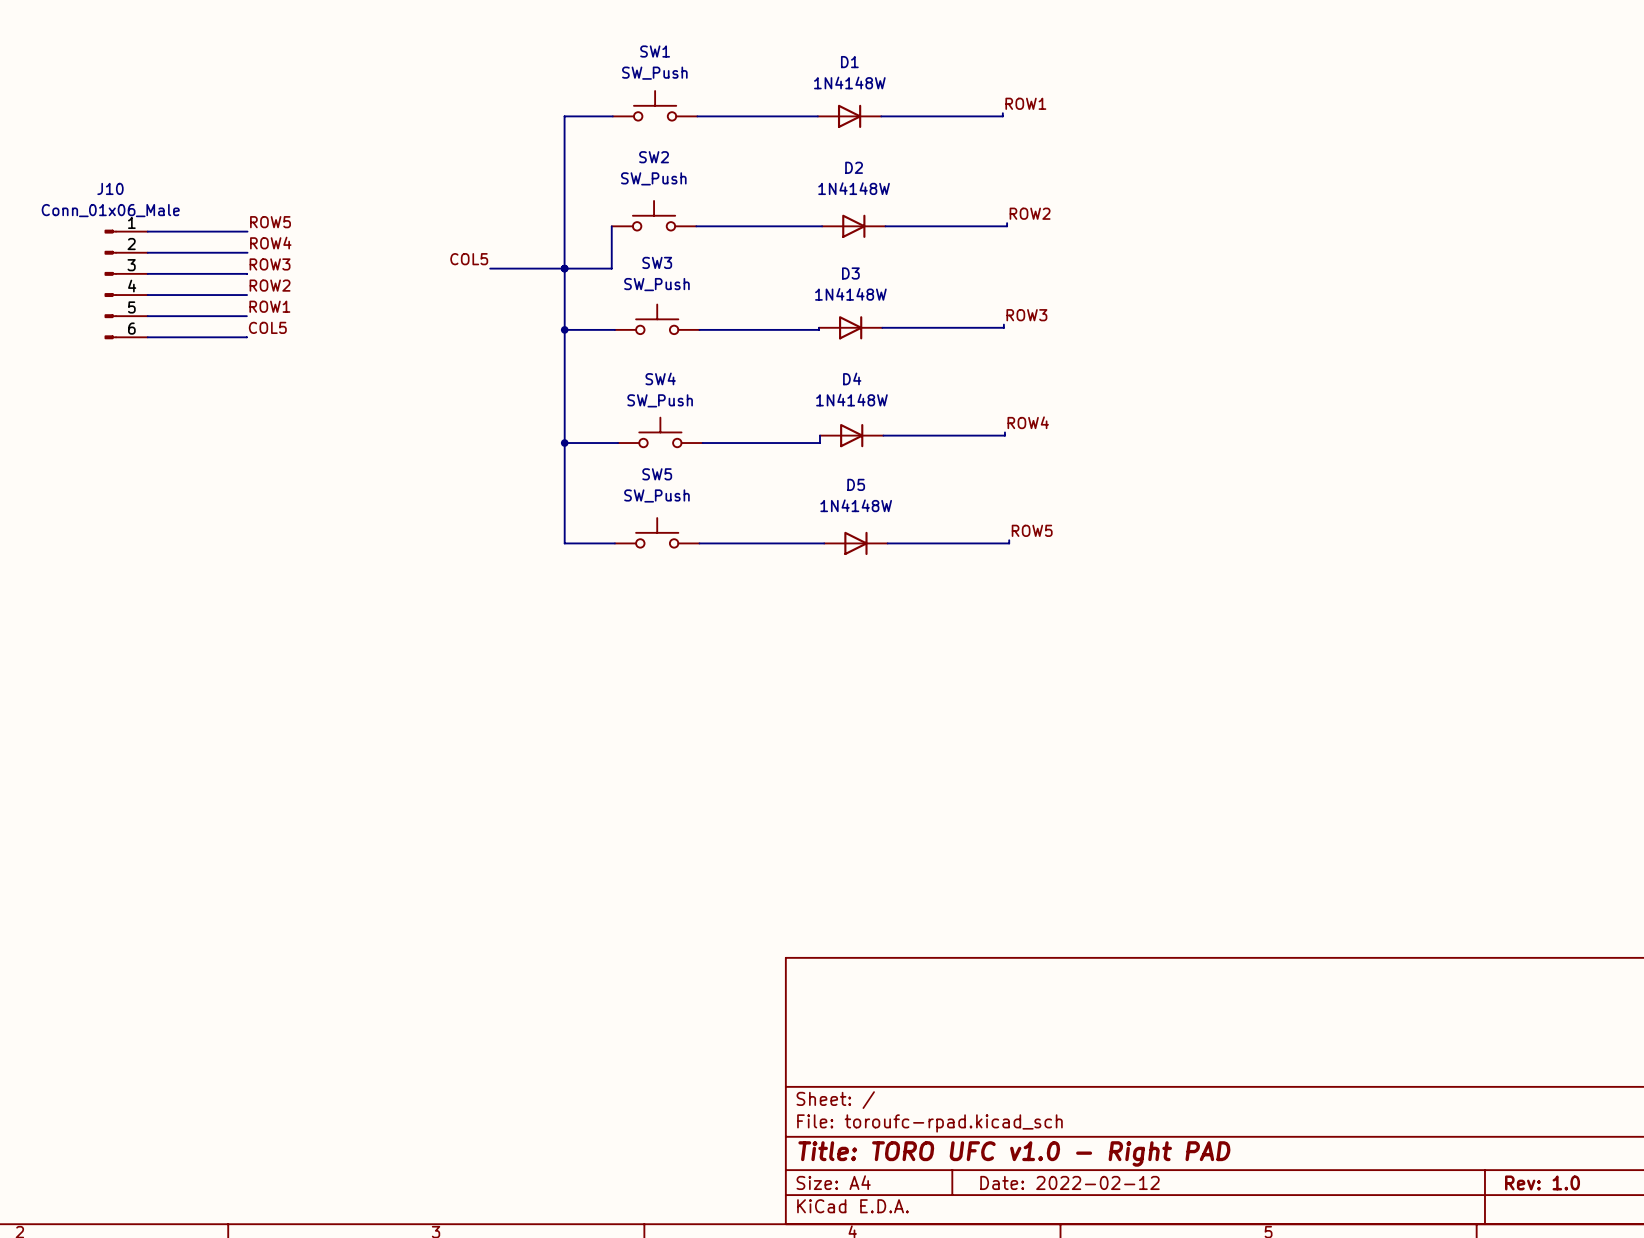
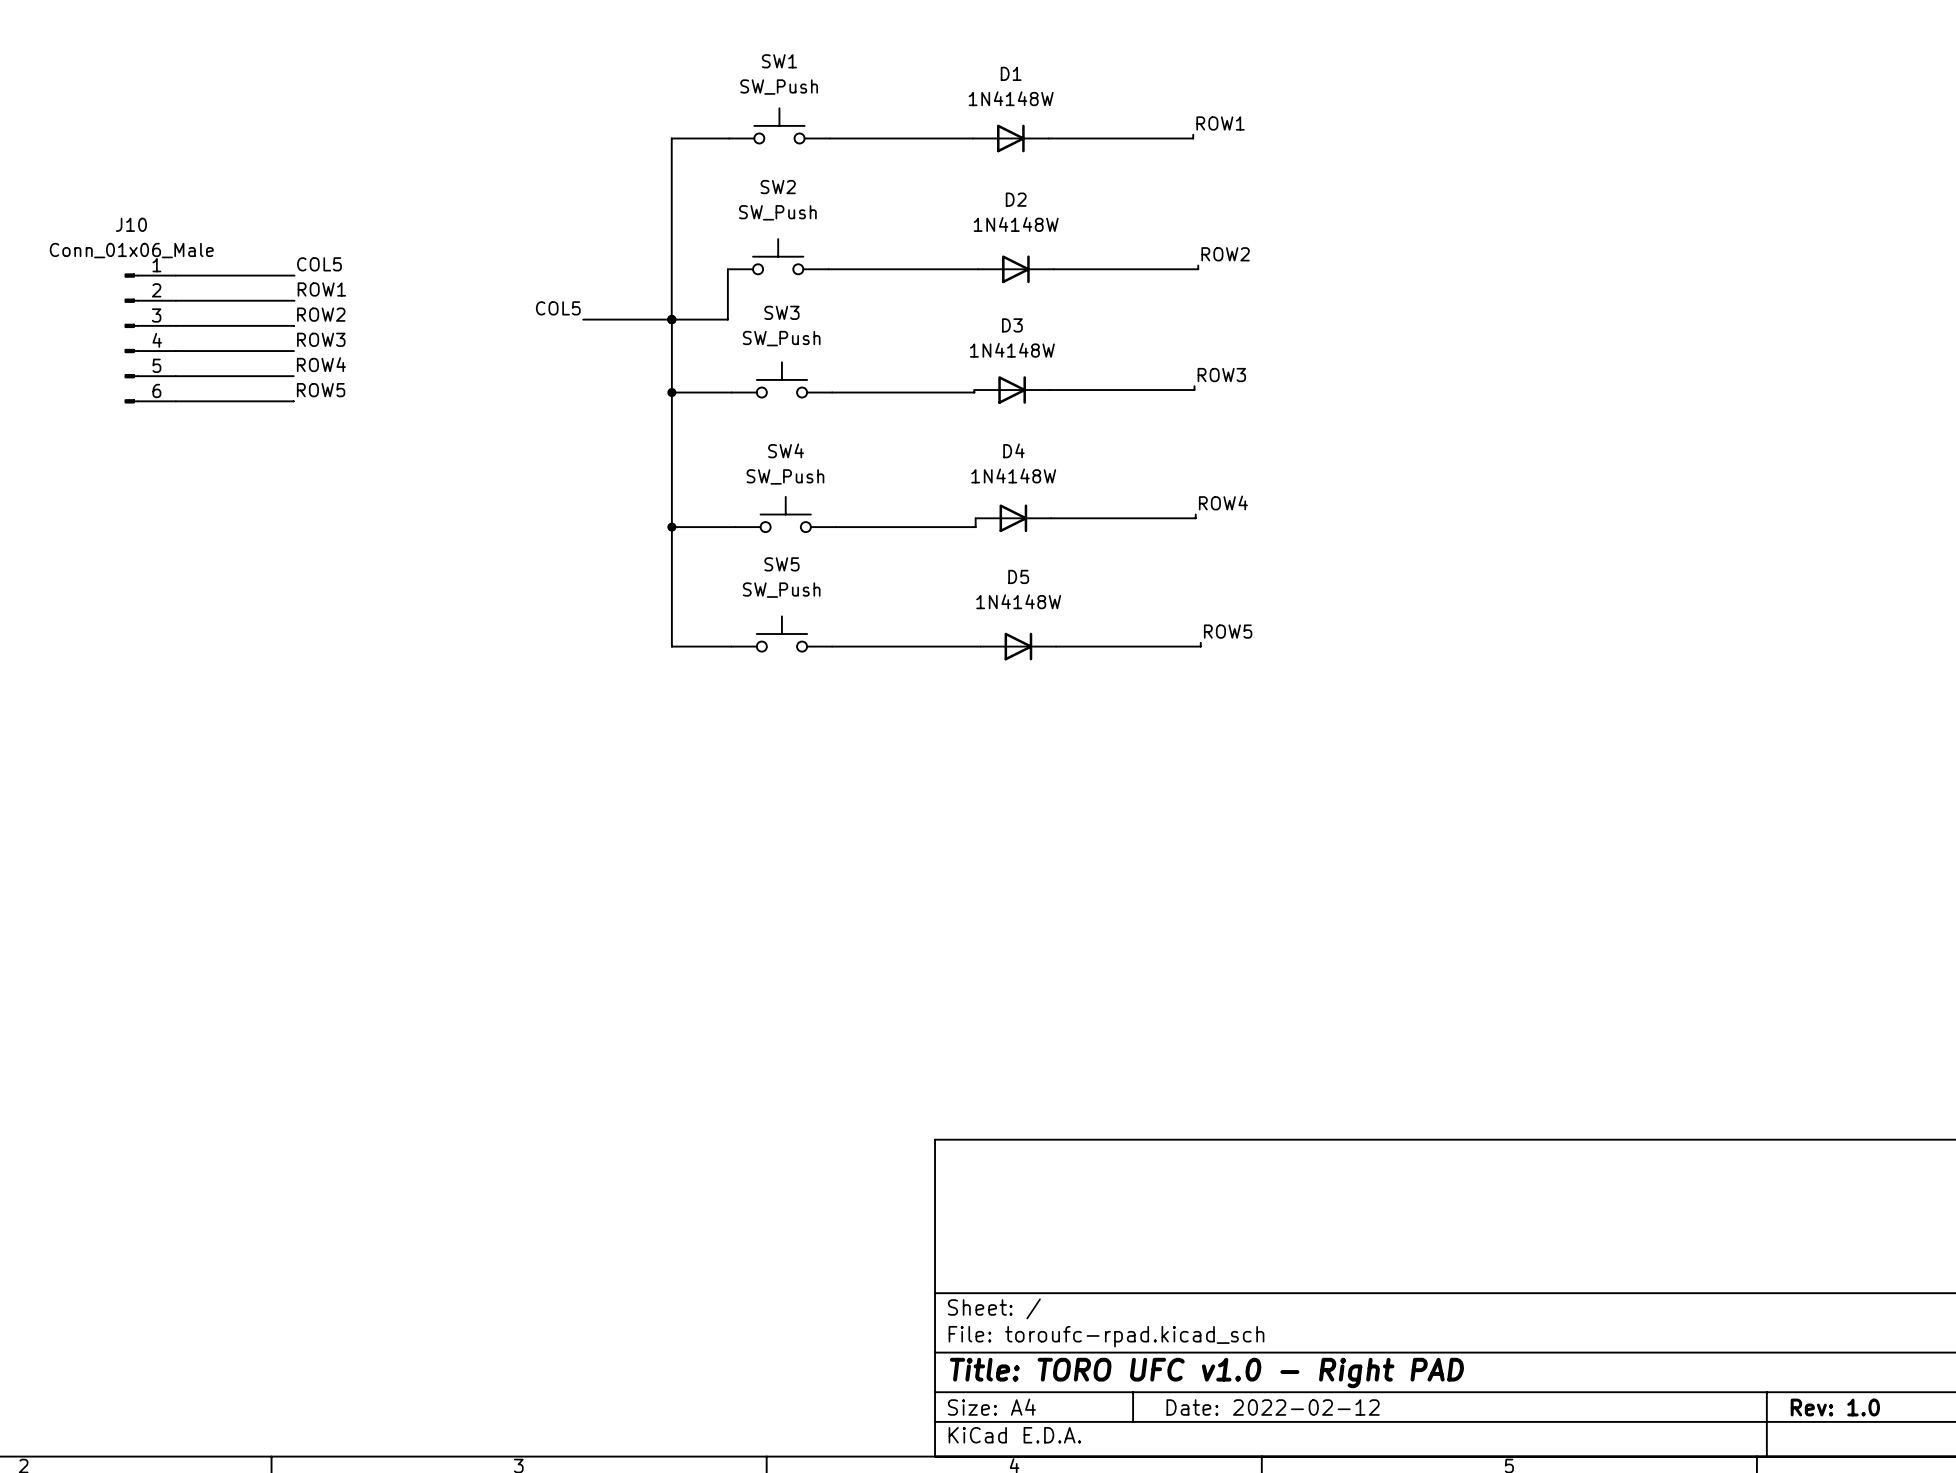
label: ROW5 (270, 222) -> COL5 (319, 264)
label: ROW4 (270, 243) -> ROW1 (321, 289)
label: ROW3 (270, 264) -> ROW2 (321, 314)
label: ROW2 (270, 285) -> ROW3 (321, 339)
label: ROW1 (269, 306) -> ROW4 (321, 364)
label: COL5 (267, 327) -> ROW5 (321, 390)

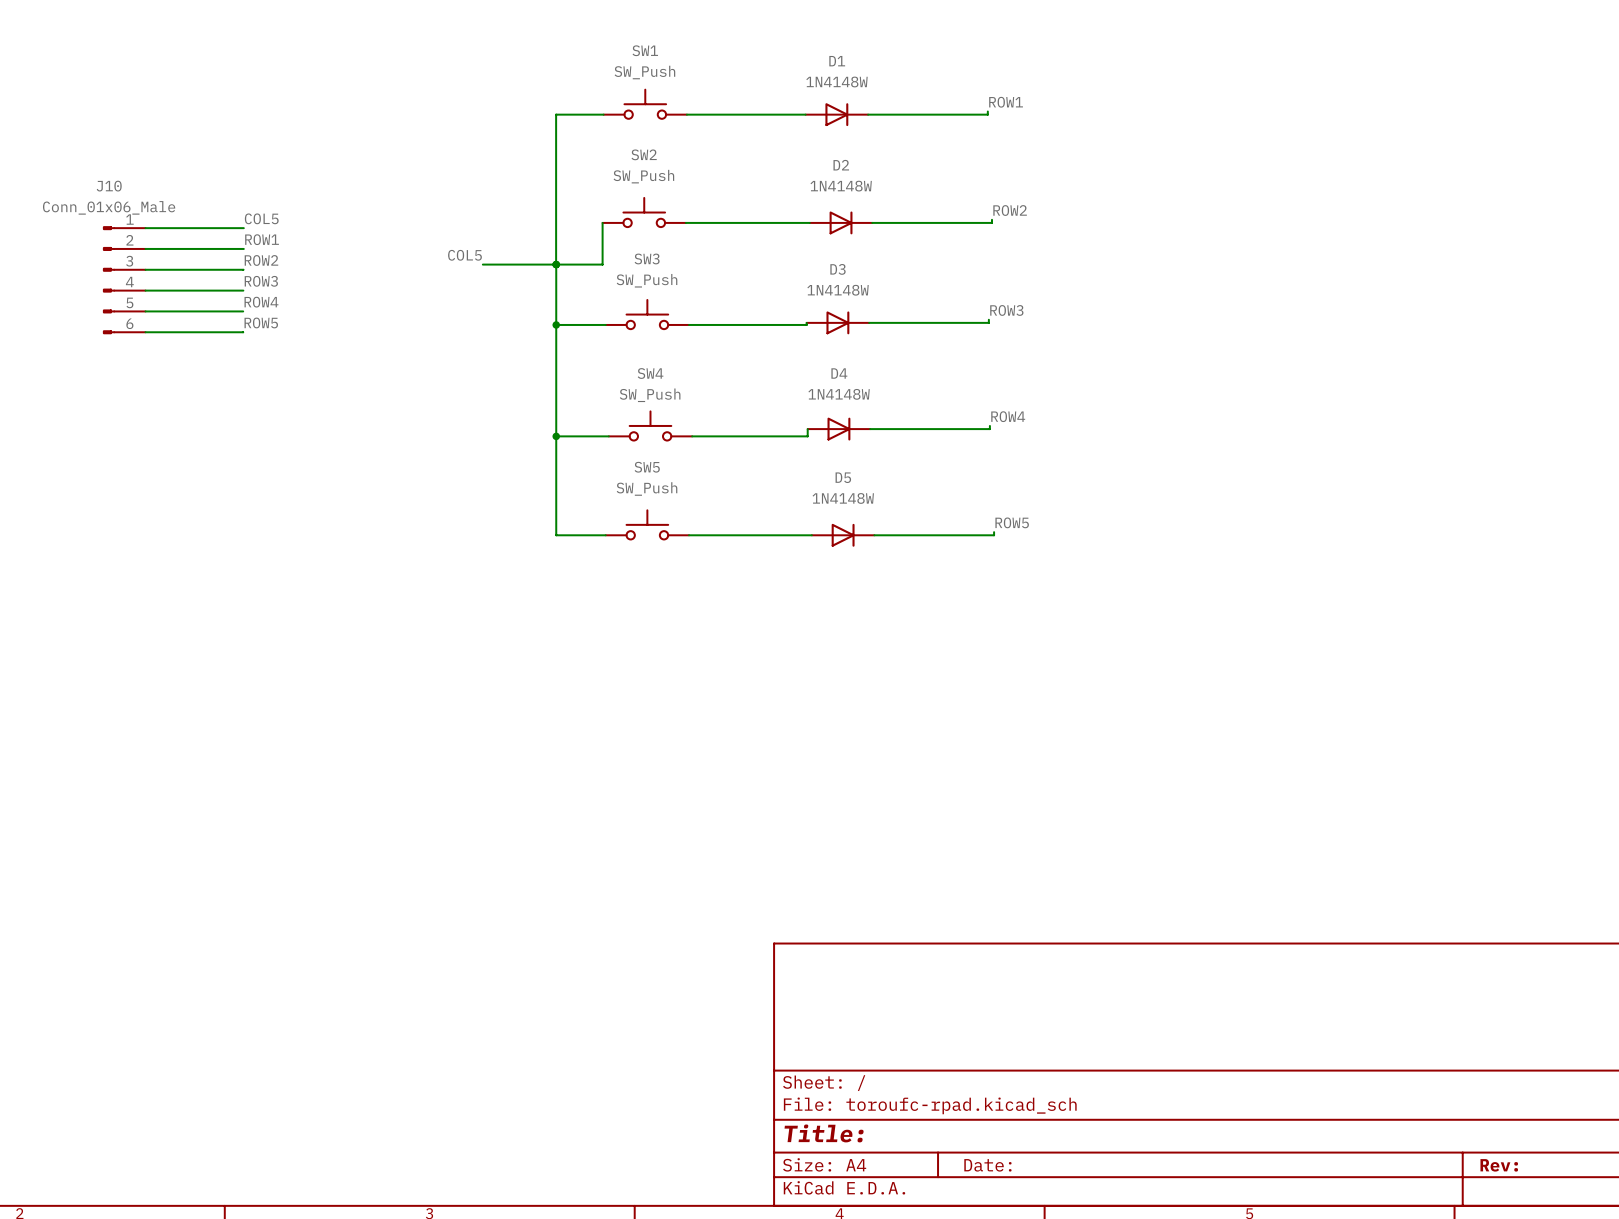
title block: Title: TORO UFC v1.0 - Right PAD (1206, 1372) -> Title: (824, 1133)
title block: Date: 2022-02-12 (1273, 1407) -> Date: (987, 1165)
title block: Rev: 1.0 (1835, 1407) -> Rev: (1499, 1165)

